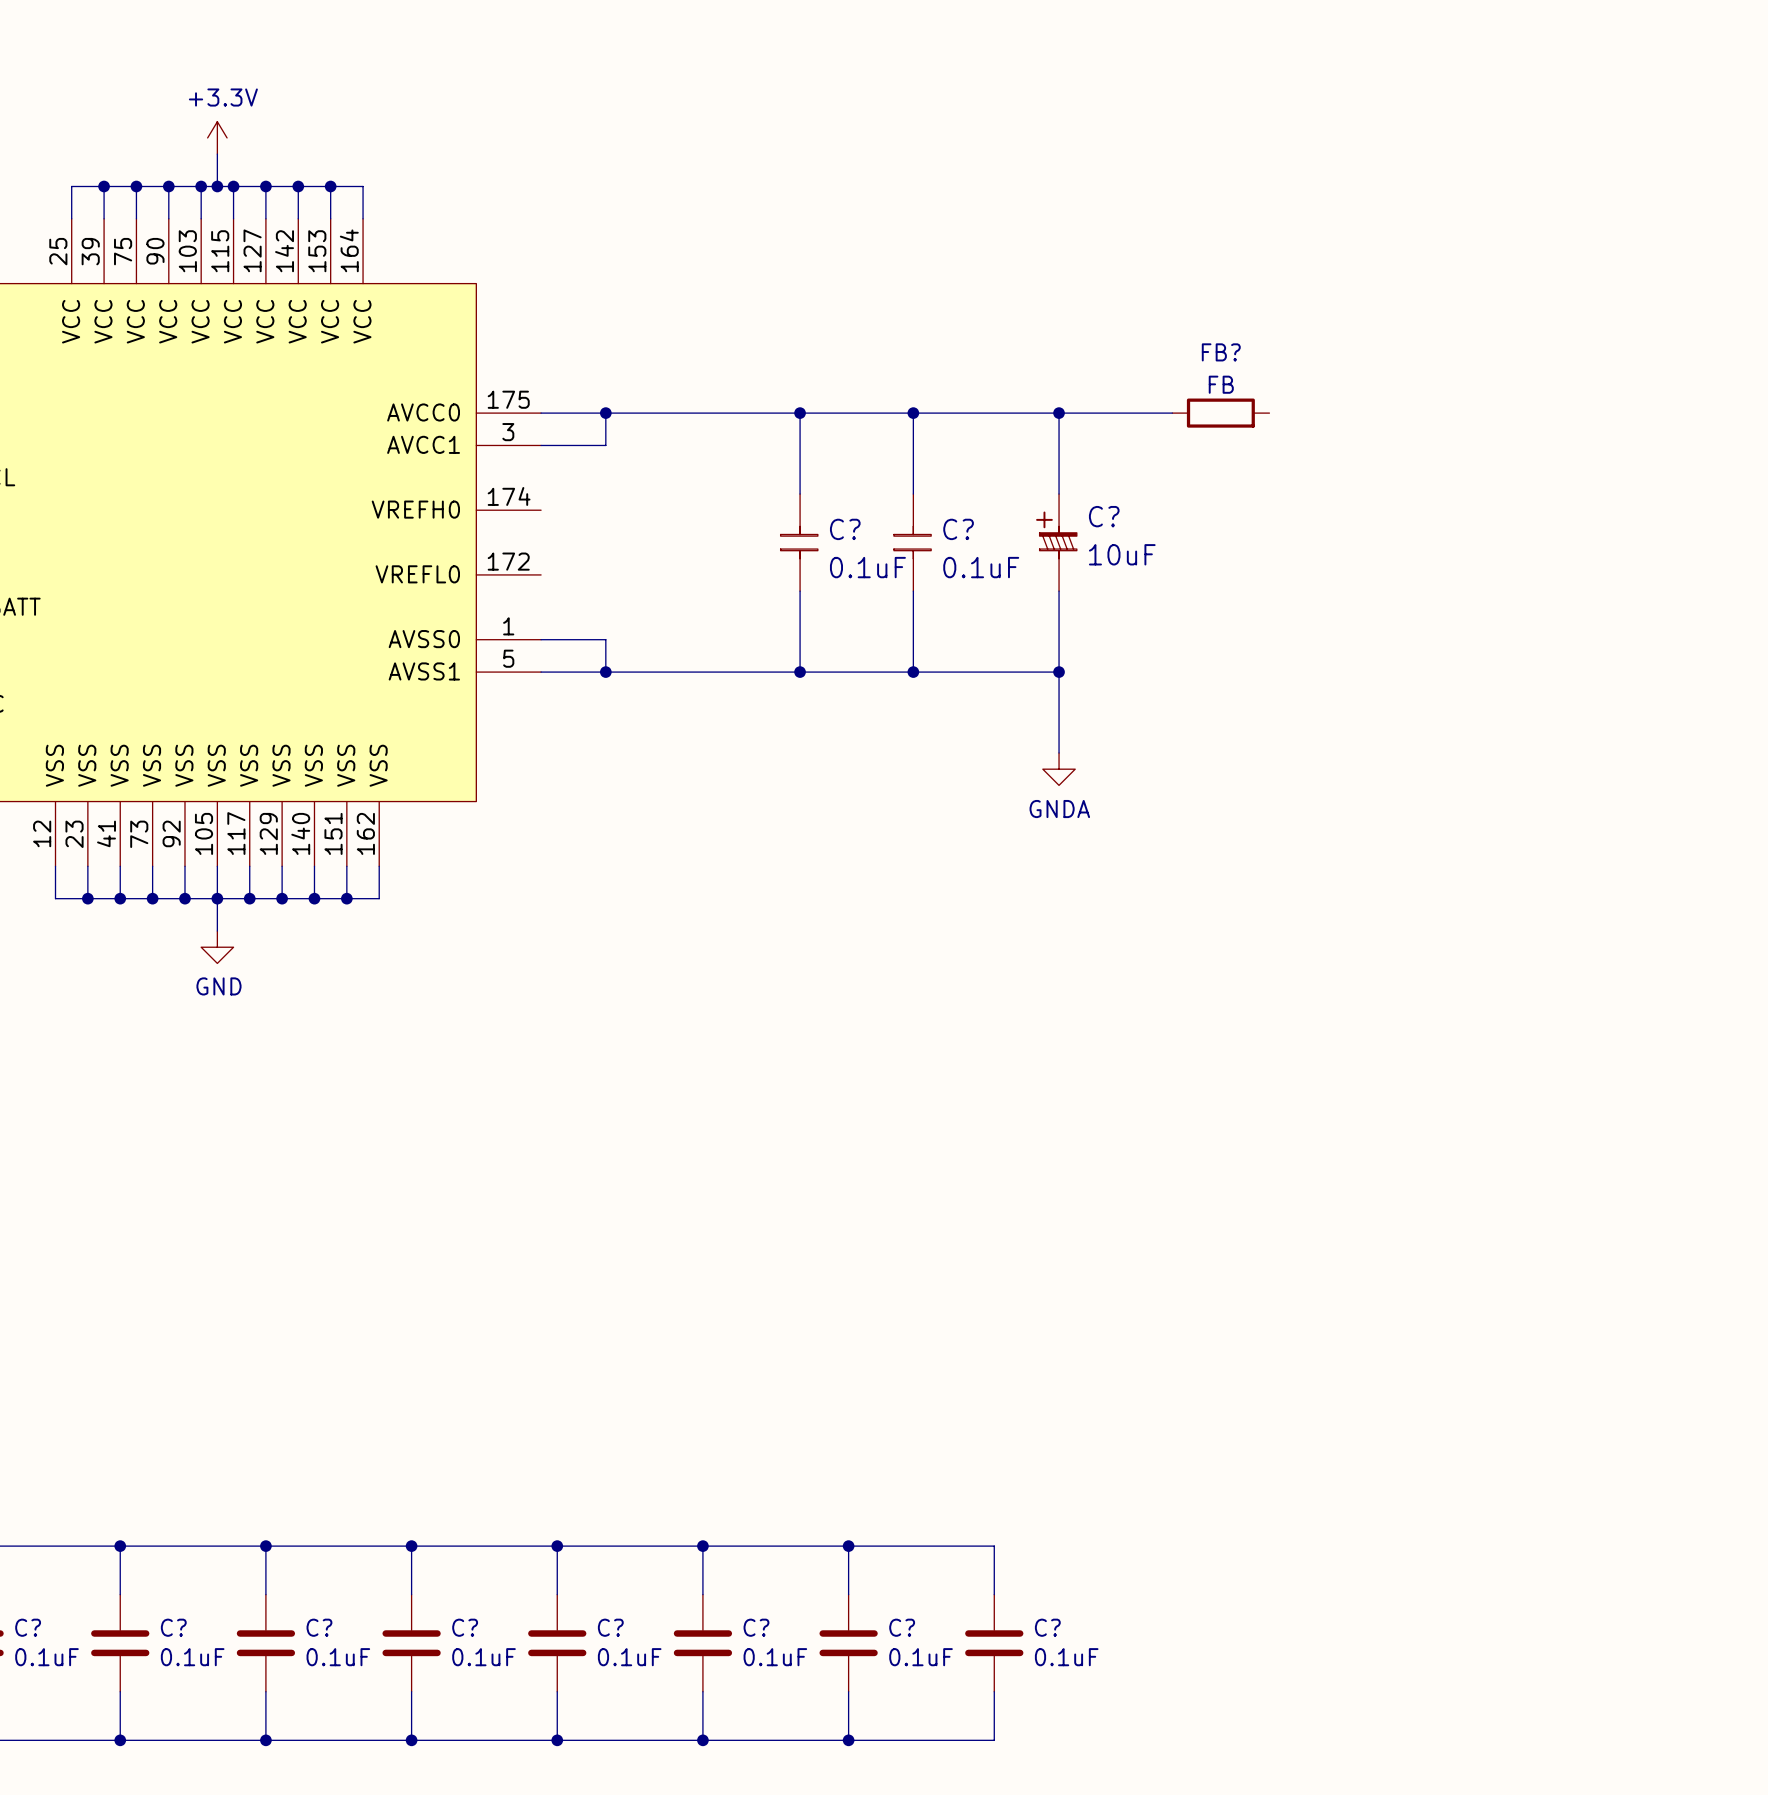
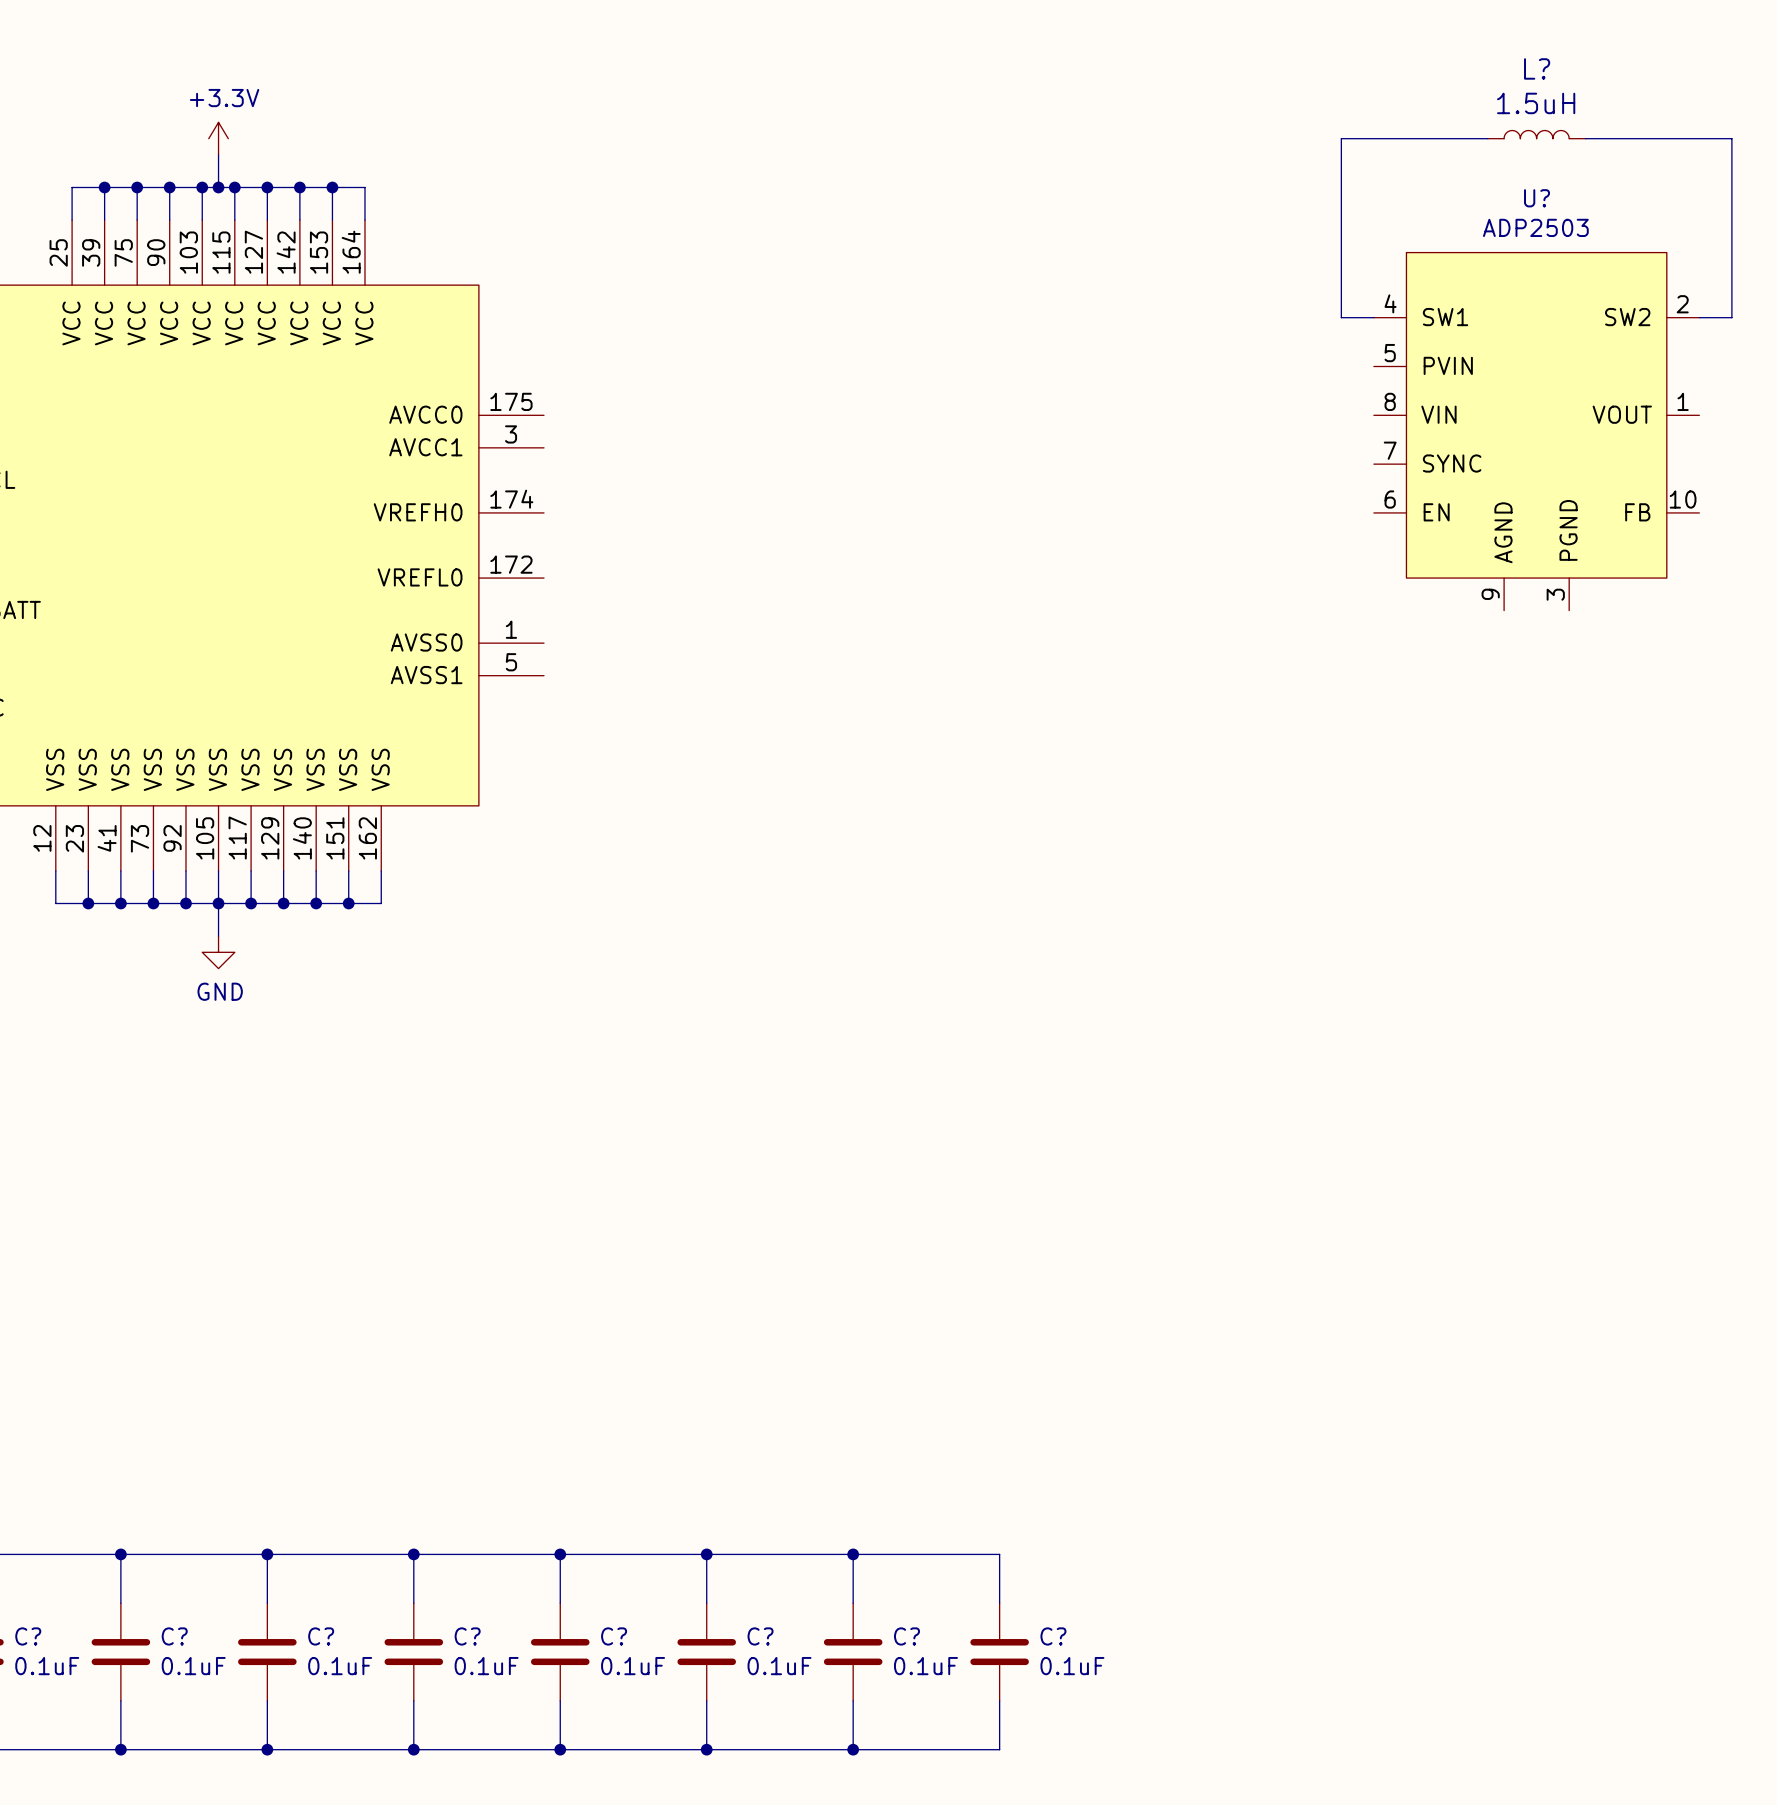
L?: none -> 1.5uH (1536, 134)
wire: none -> (1487, 138) (1341, 138) (1341, 317) (1373, 317)
wire: none -> (1585, 138) (1731, 138) (1731, 317) (1699, 317)
wire: (541, 413) (1172, 413) -> none
wire: (605, 413) (605, 445) (541, 445) -> none
junction: (605, 413) -> none
wire: (800, 413) (800, 494) -> none
junction: (800, 413) -> none
wire: (913, 413) (913, 494) -> none
junction: (913, 413) -> none
wire: (1059, 413) (1059, 494) -> none
junction: (1059, 413) -> none
FB?: FB (1220, 413) -> none
U?: none -> ADP2503 (1536, 431)
C?: 0.1uF (799, 542) -> none
C?: 0.1uF (912, 542) -> none
C?: 10uF (1058, 542) -> none
wire: (800, 591) (800, 672) -> none
wire: (913, 591) (913, 672) -> none
wire: (1059, 591) (1059, 752) -> none
wire: (541, 639) (605, 639) (605, 672) -> none
wire: (541, 672) (1059, 672) -> none
junction: (605, 672) -> none
junction: (800, 672) -> none
junction: (913, 672) -> none
junction: (1059, 672) -> none
power symbol: GNDA (1059, 769) -> none

